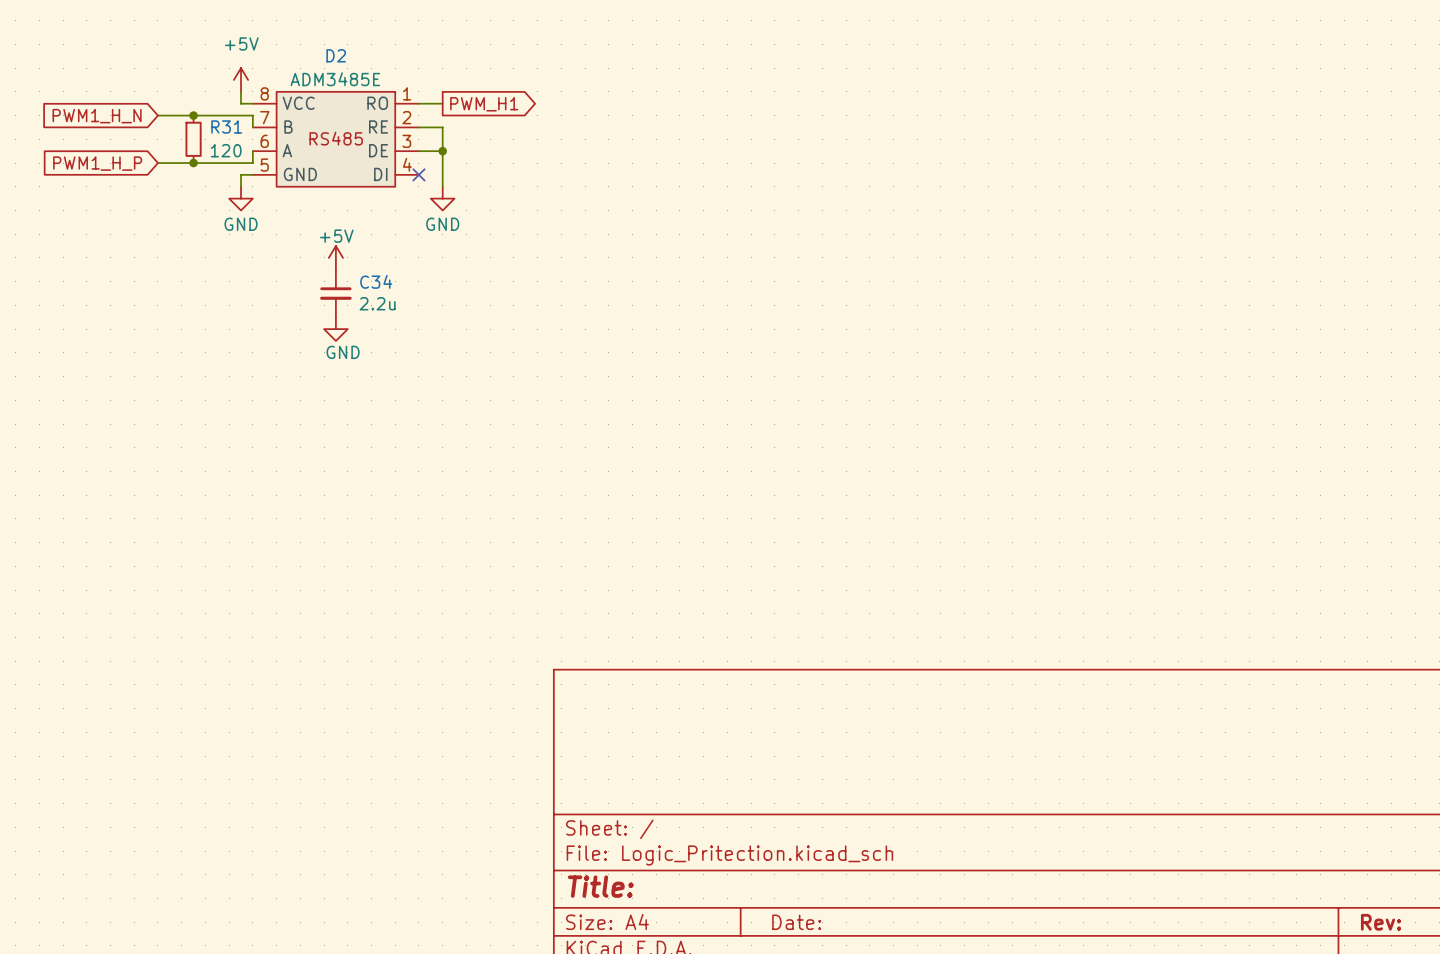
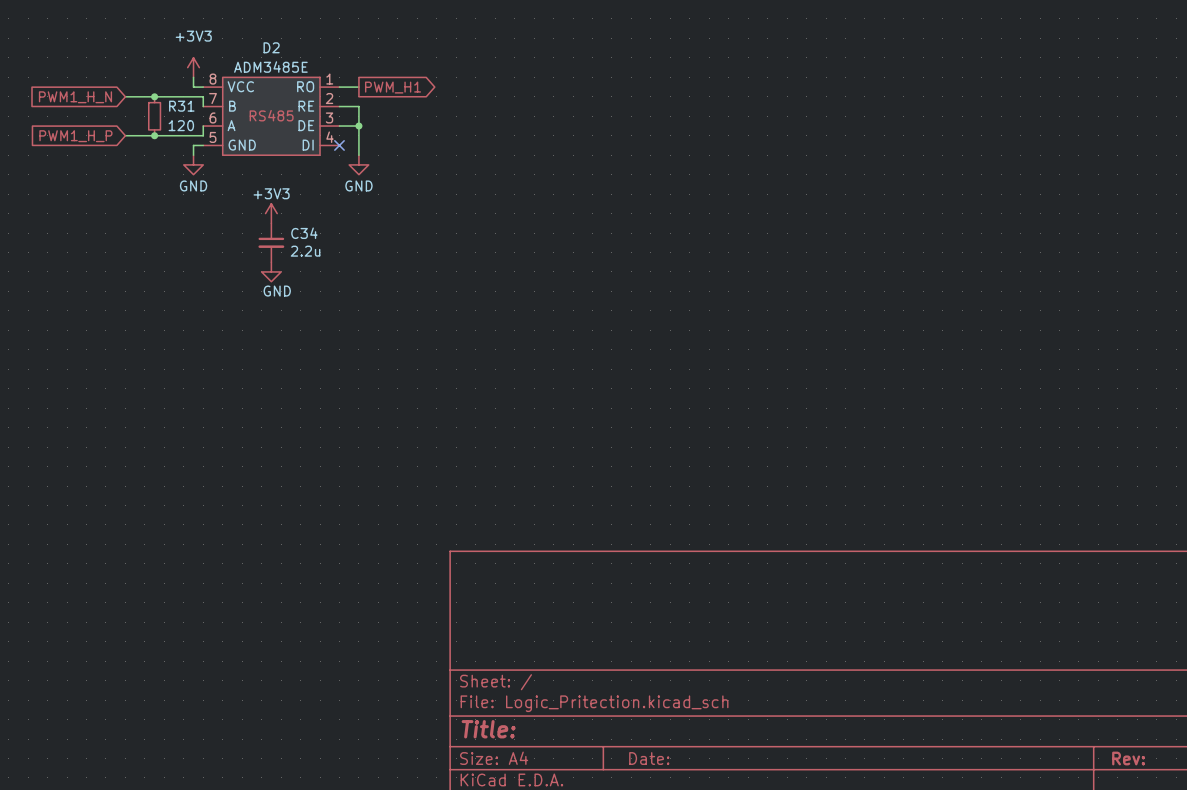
power symbol: +5V (241, 79) -> +3V3 (193, 67)
power symbol: +5V (335, 257) -> +3V3 (271, 213)

